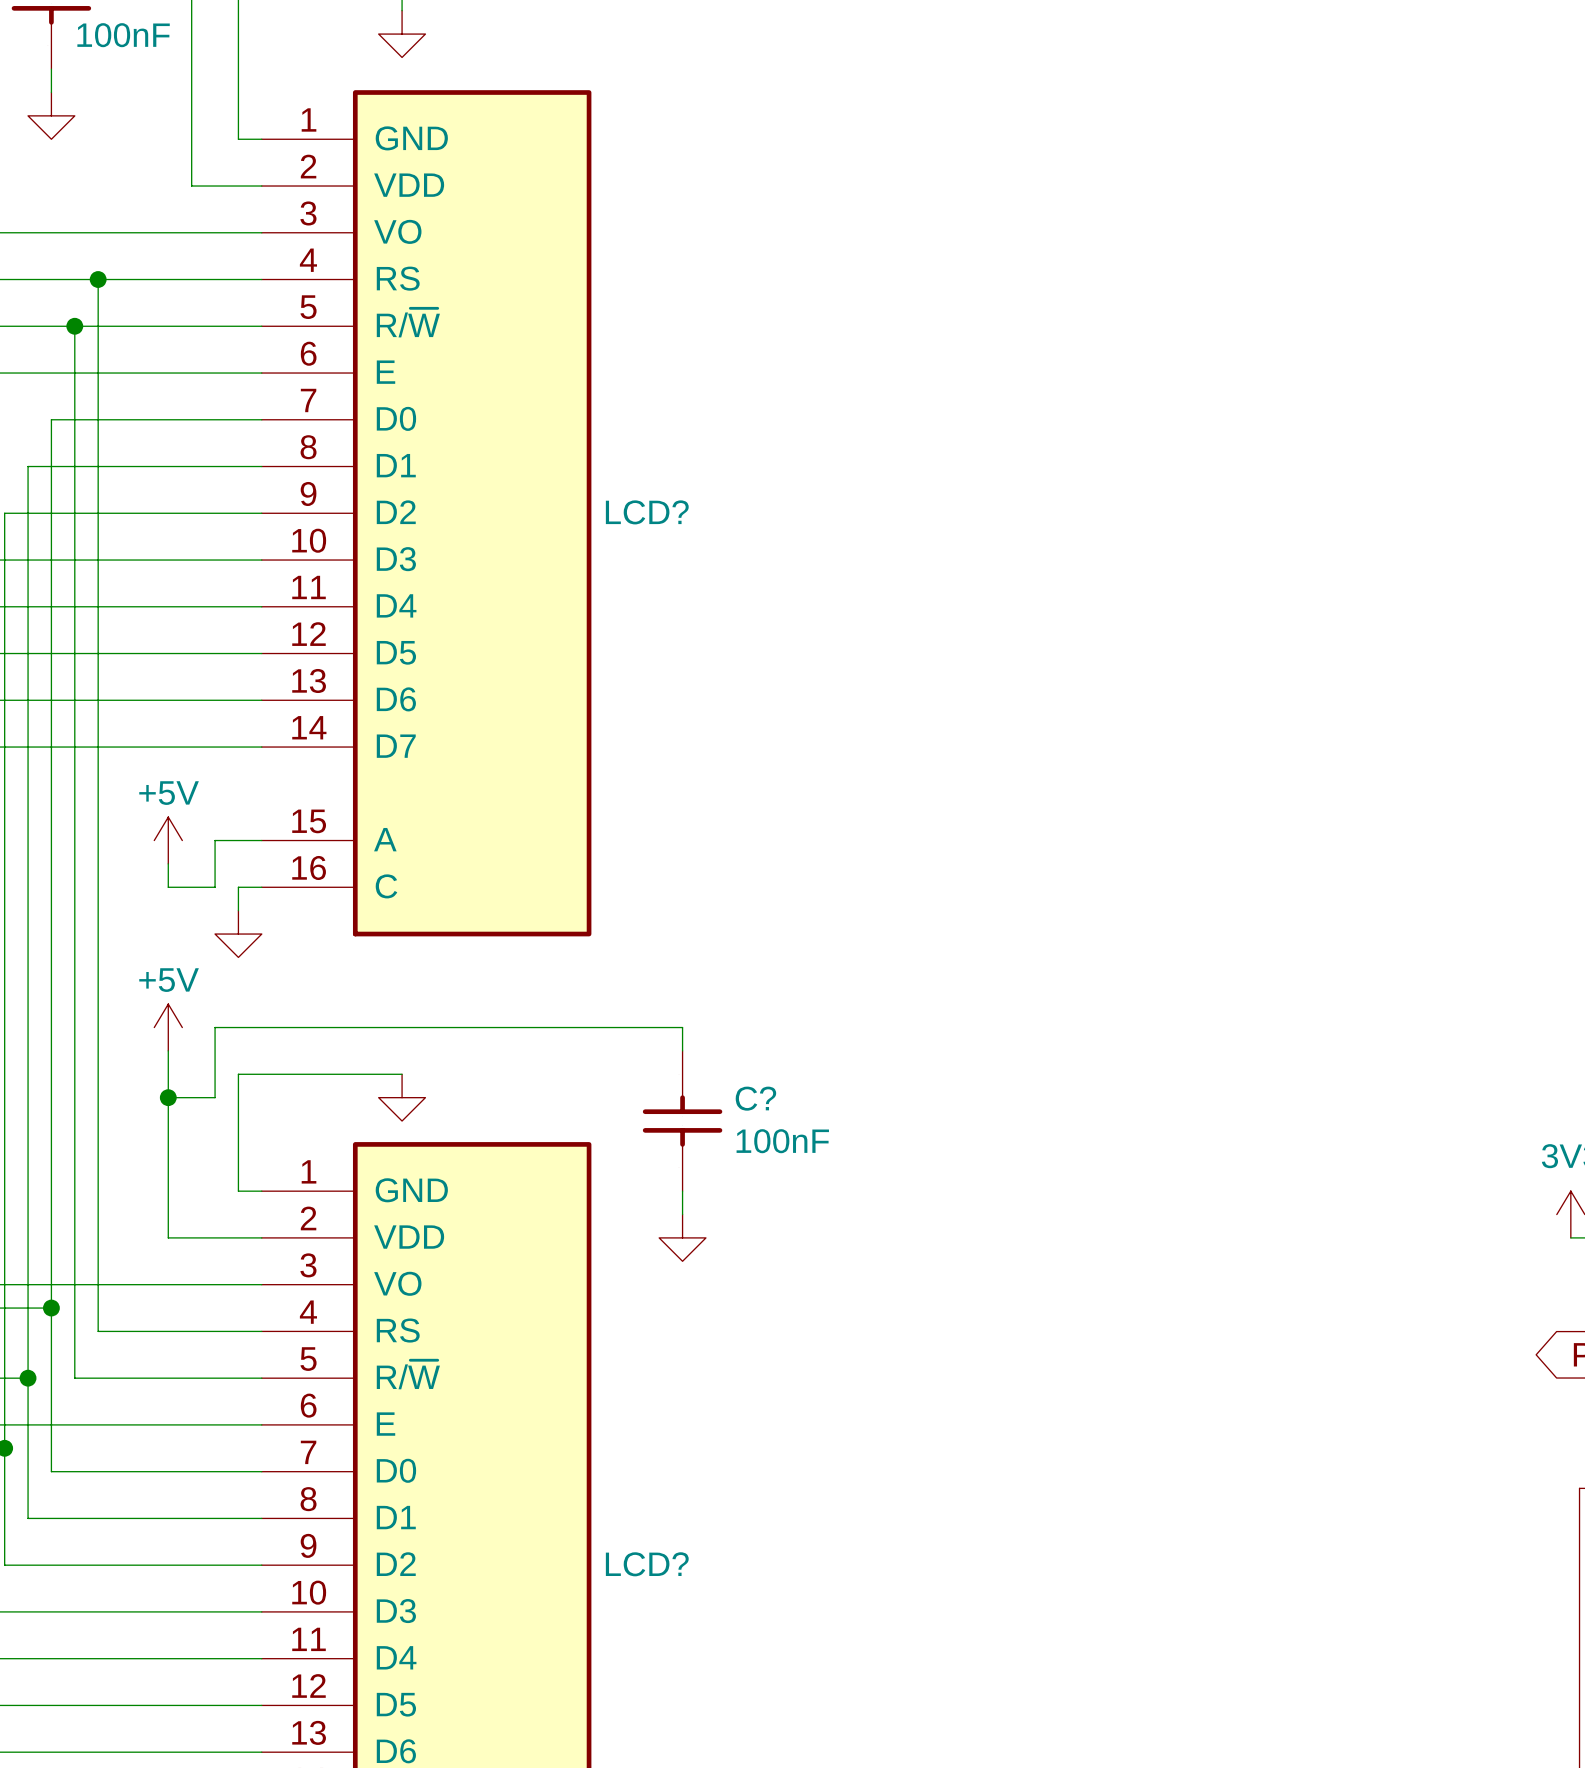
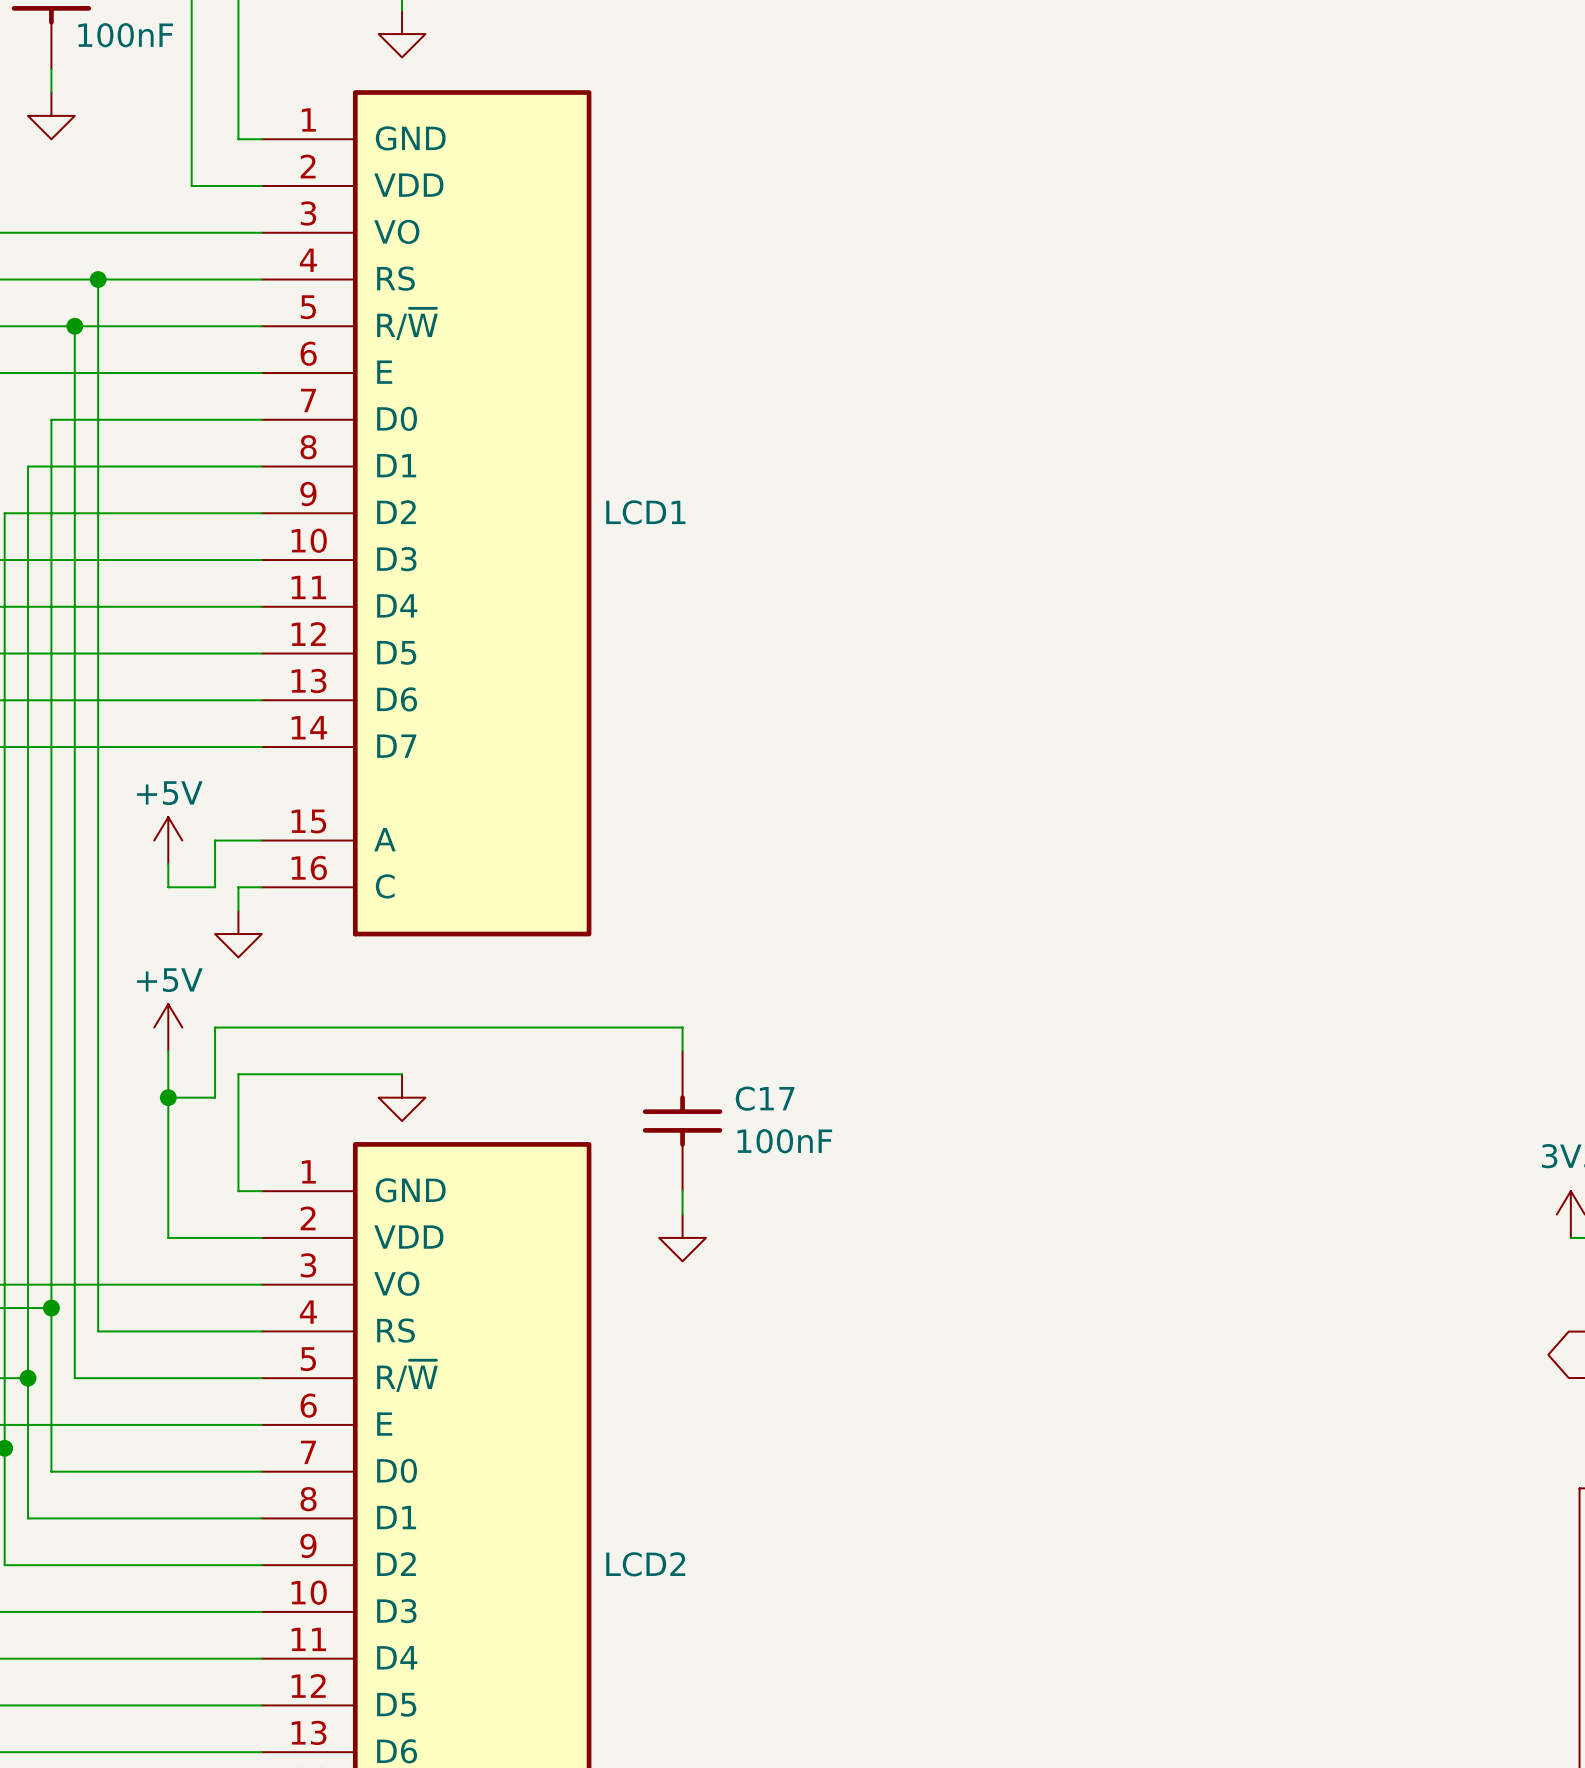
LCD? name: LCD? (647, 512) -> LCD1 (645, 512)
C? name: C? (755, 1098) -> C17 (765, 1098)
LCD? name: LCD? (647, 1564) -> LCD2 (645, 1564)

